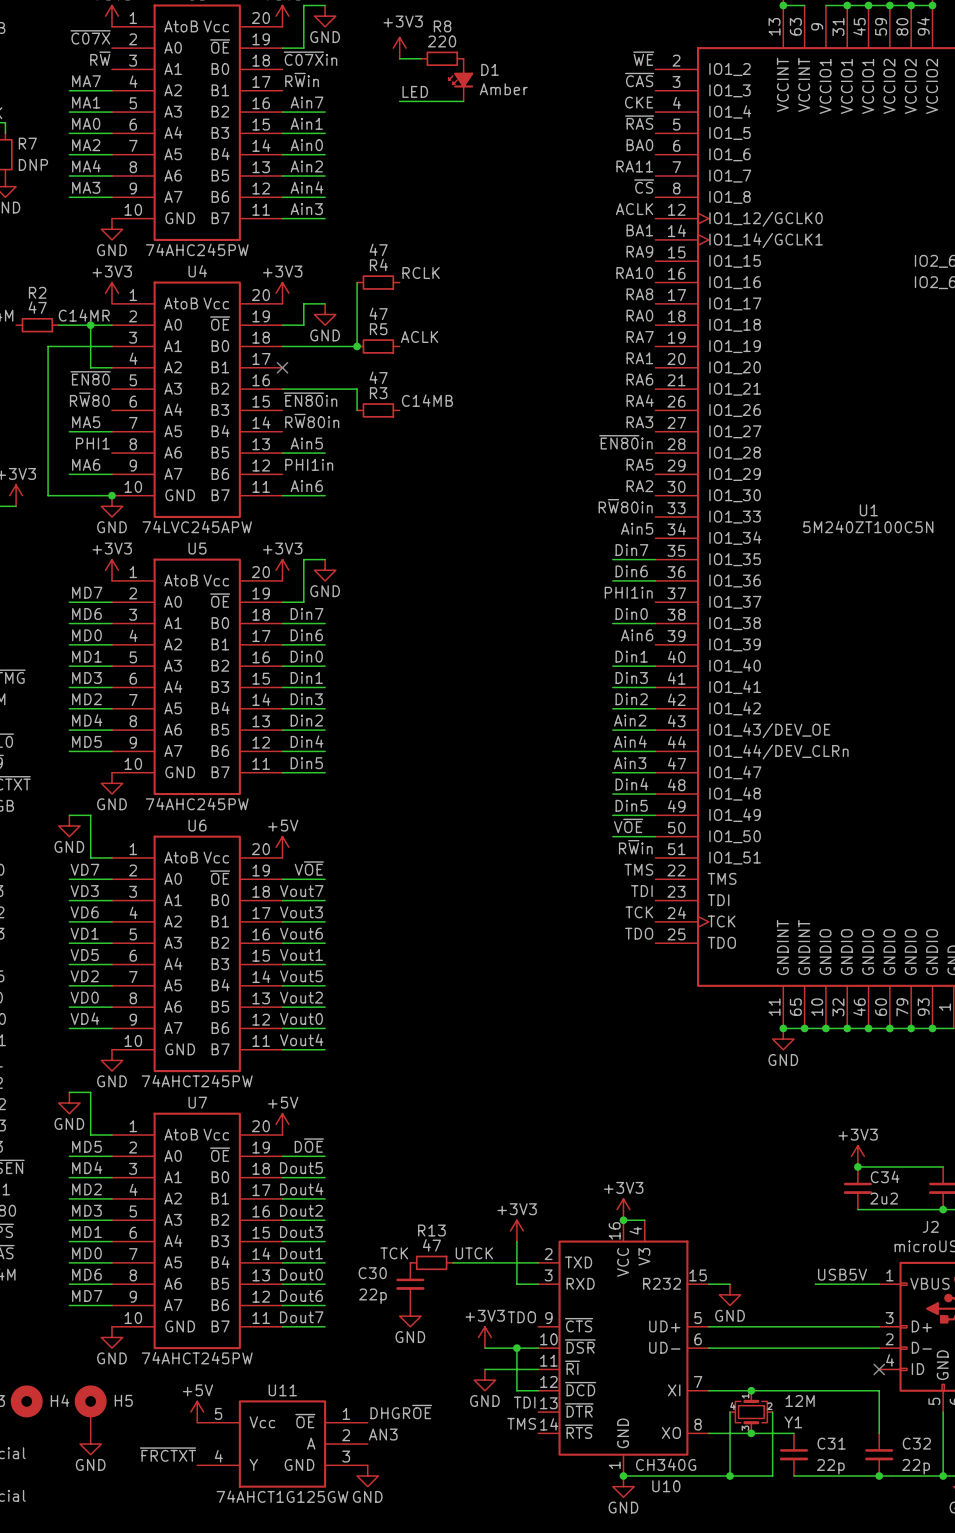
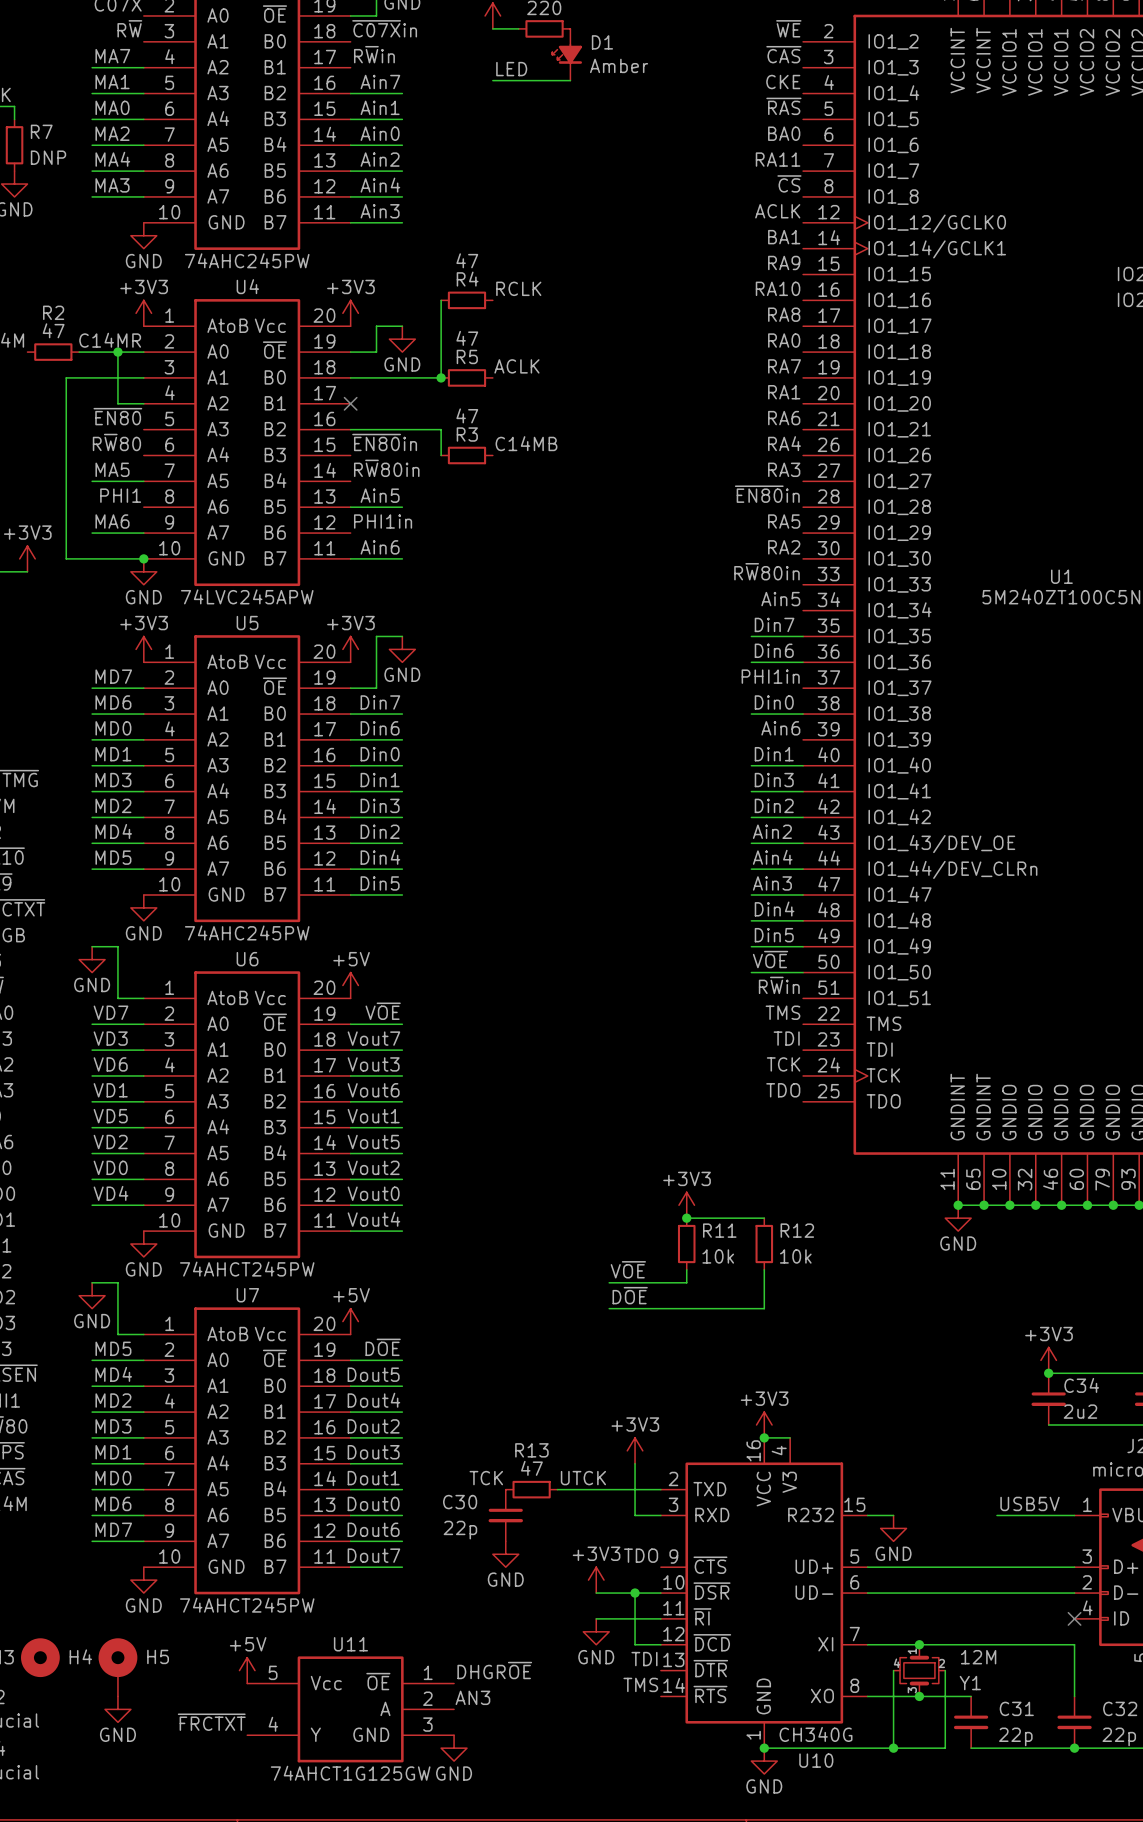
power symbol: none -> +3V3 (686, 1205)
wire: none -> (686, 1218) (764, 1218)
junction: none -> (686, 1218)
R11: none -> 10k (686, 1244)
R12: none -> 10k (764, 1244)
label: none -> V~{OE} (628, 1269)
wire: none -> (686, 1269) (686, 1282) (609, 1282)
wire: none -> (764, 1269) (764, 1308) (609, 1308)
label: none -> D~{OE} (630, 1295)

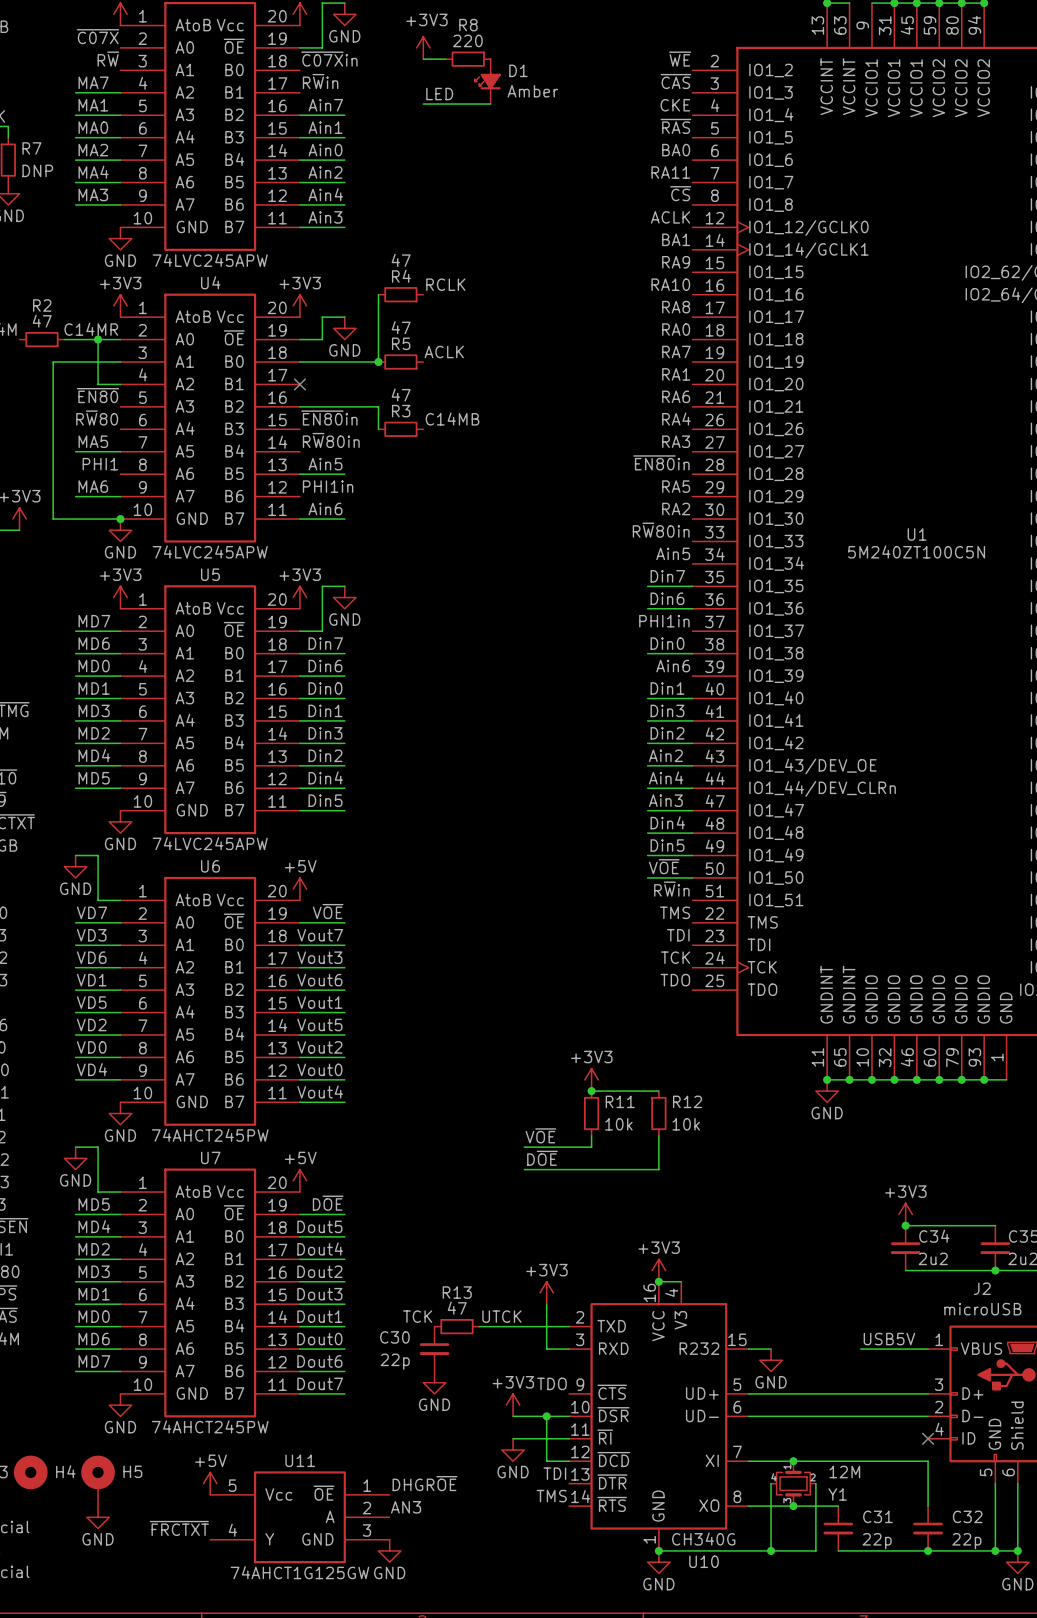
part value: 74AHC245PW (247, 260) -> 74LVC245APW (210, 260)
U5 value: 74AHC245PW (247, 932) -> 74LVC245APW (210, 843)

